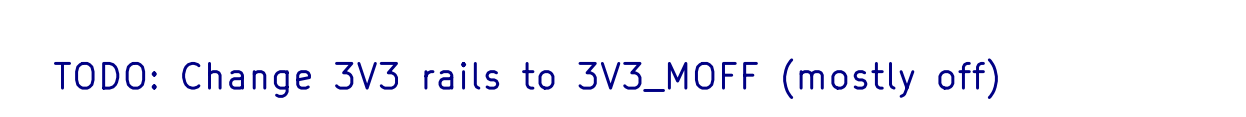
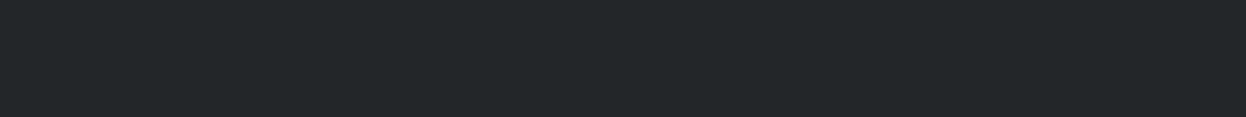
text: TODO: Change 3V3 rails to 3V3_MOFF (mostly off) (525, 78) -> none

